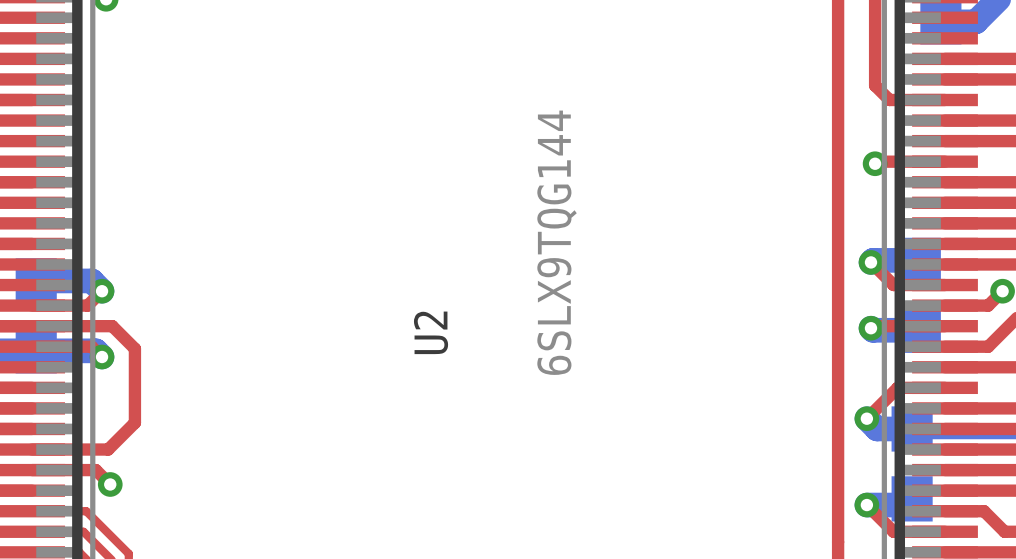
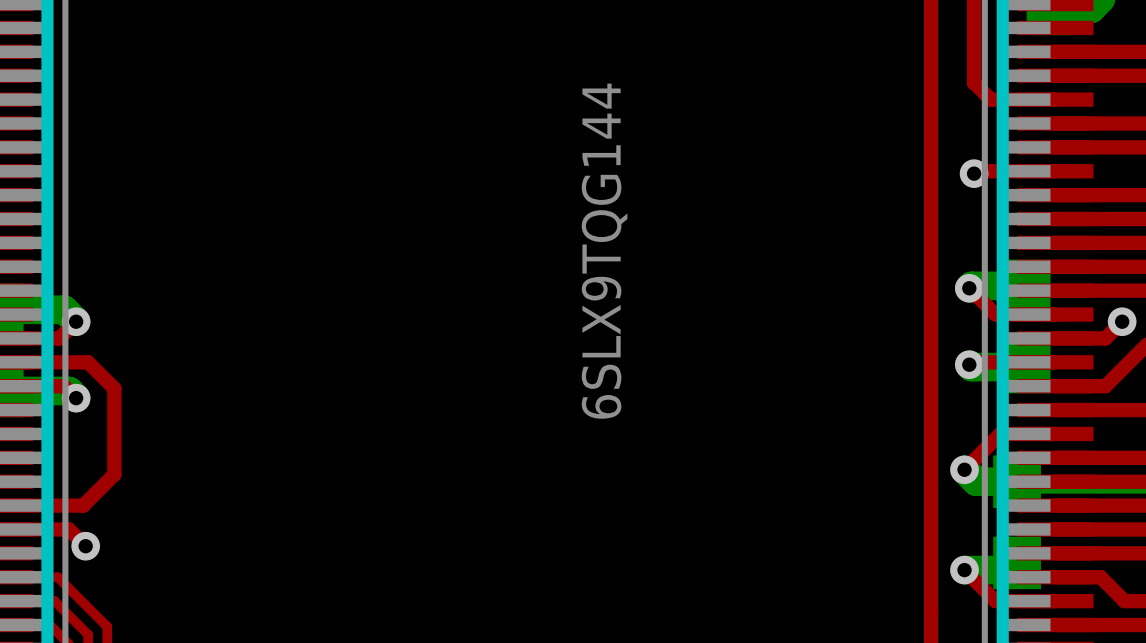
U2 name: U2 (431, 332) -> none

